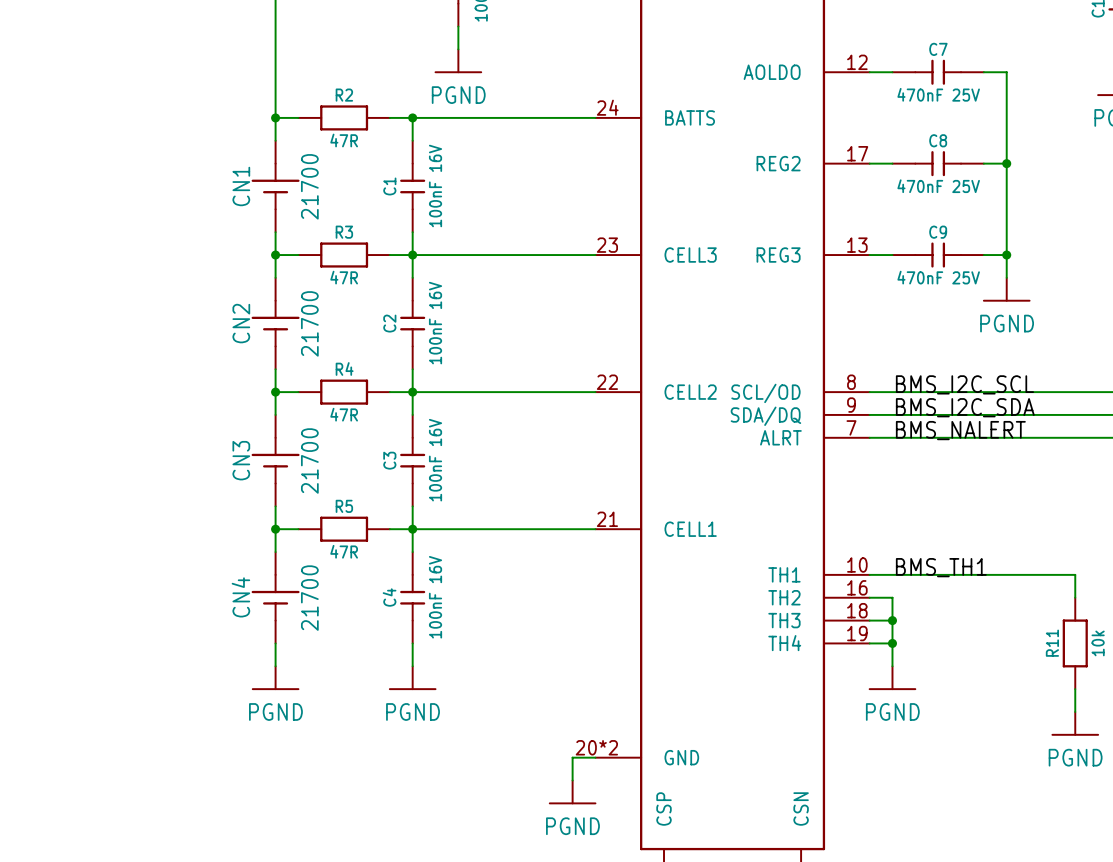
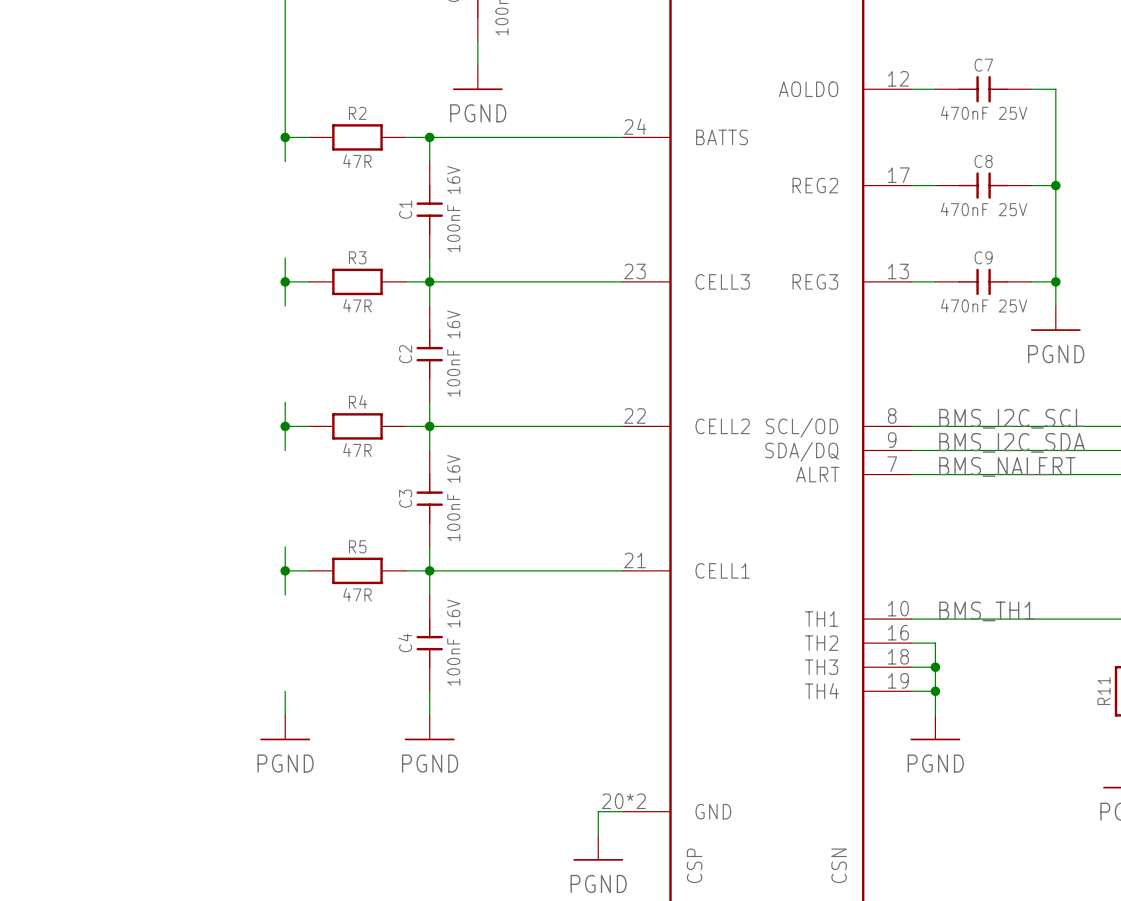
CN1: 21700 (275, 186) -> none
CN2: 21700 (275, 323) -> none
CN3: 21700 (275, 460) -> none
CN4: 21700 (275, 597) -> none

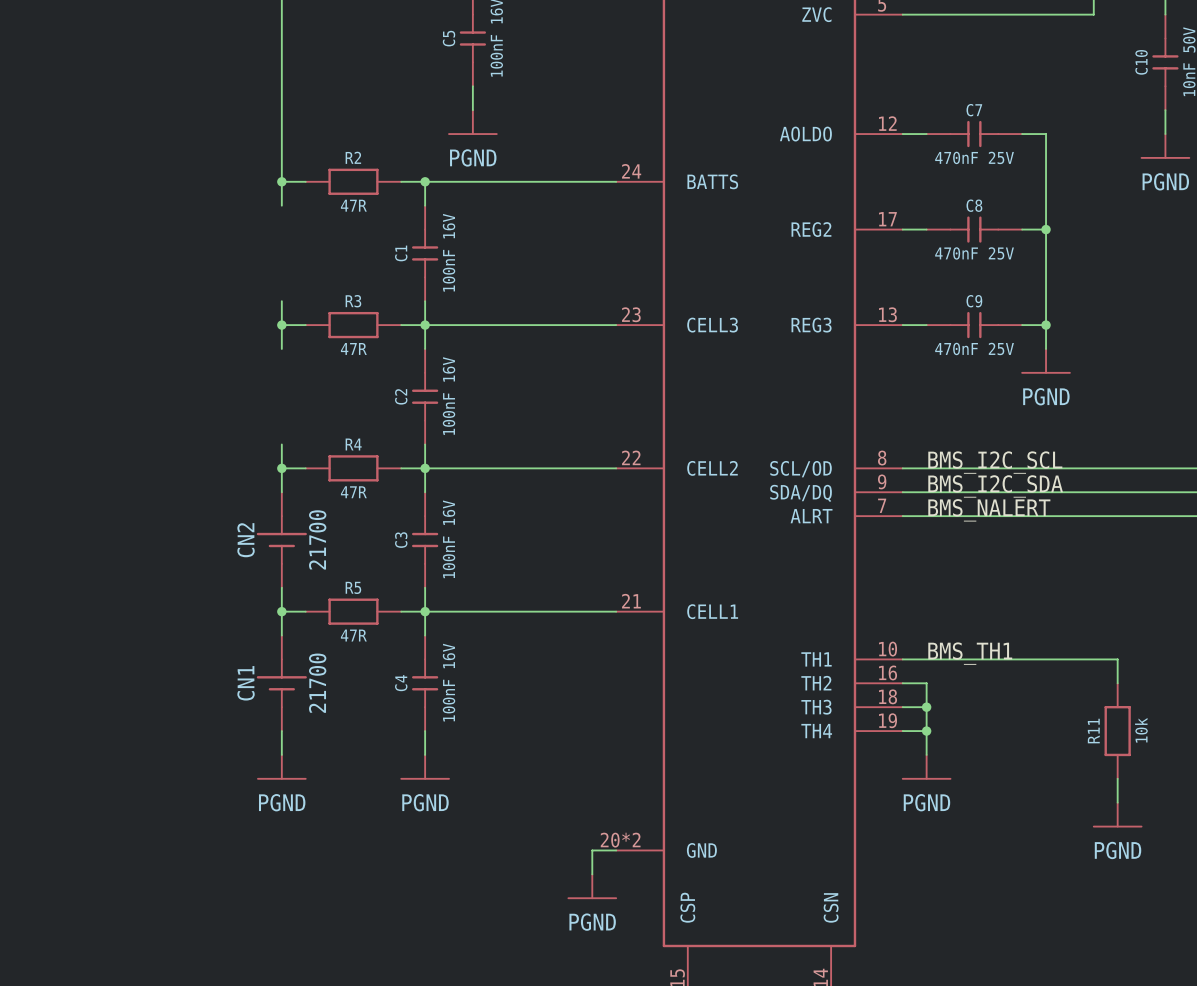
CN2: none -> 21700 (281, 540)
CN1: none -> 21700 (281, 683)

